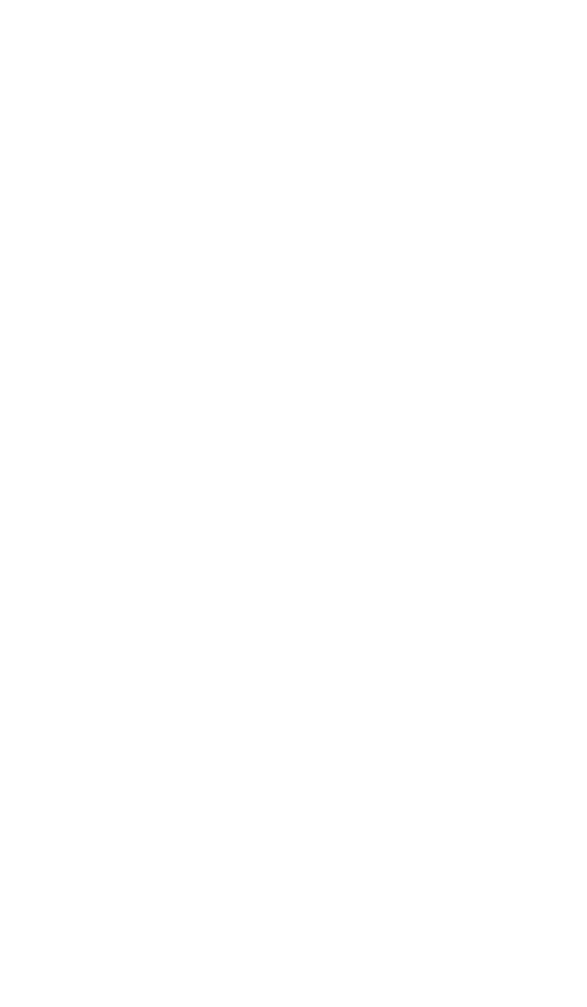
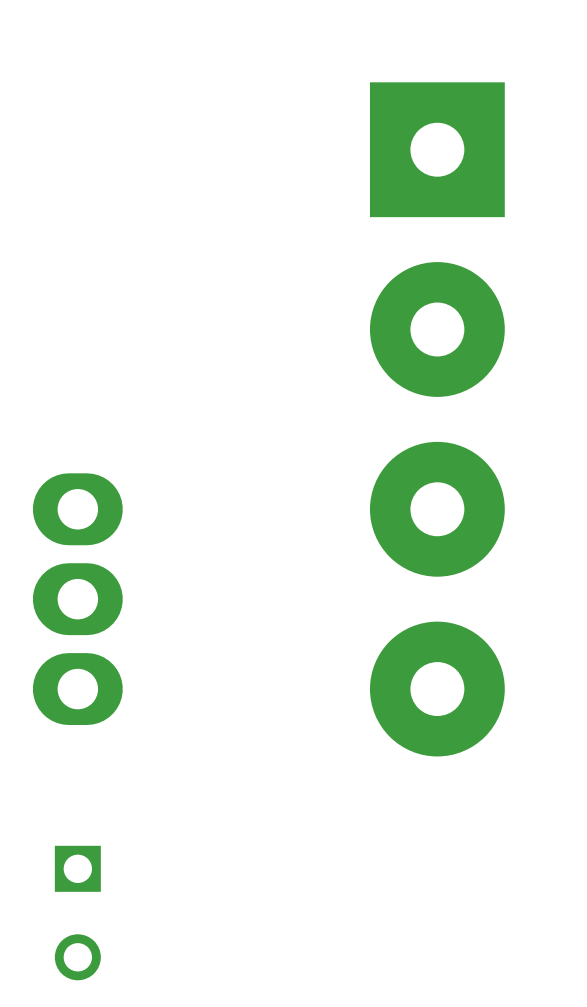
part: none -> (437, 419)
part: none -> (77, 599)
part: none -> (77, 913)

